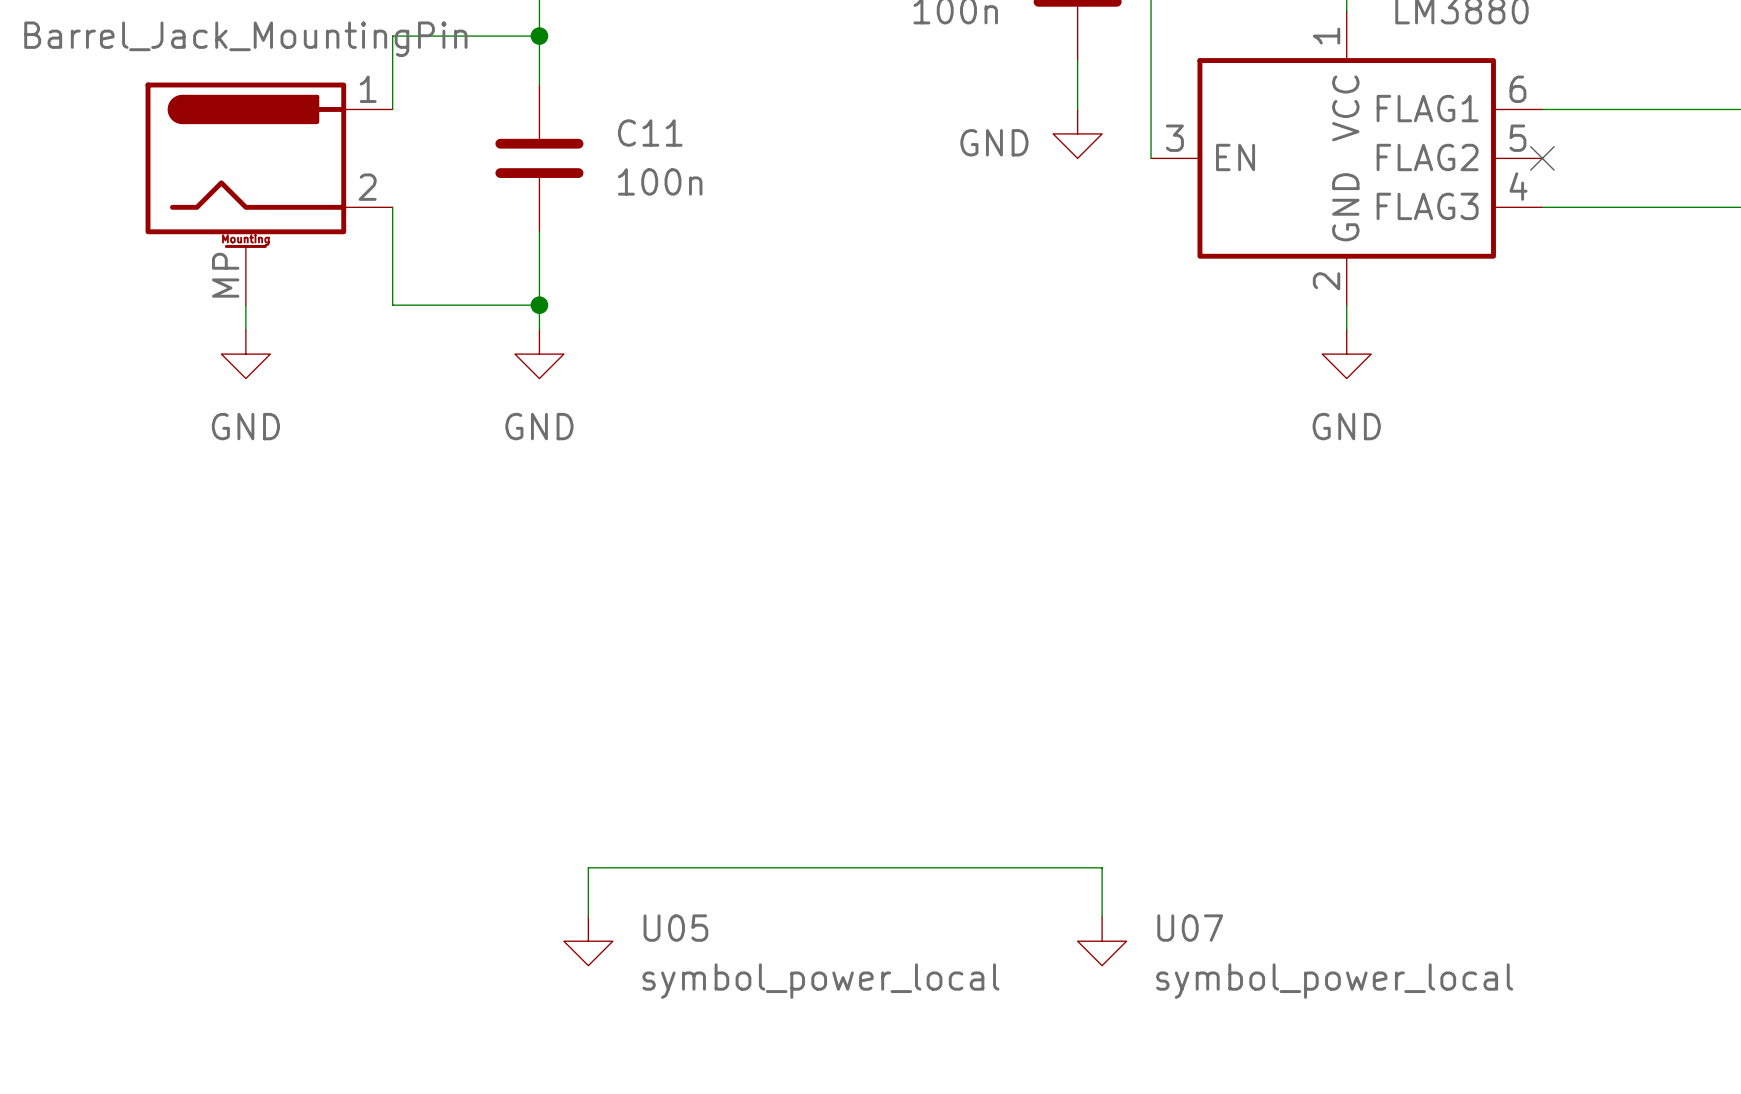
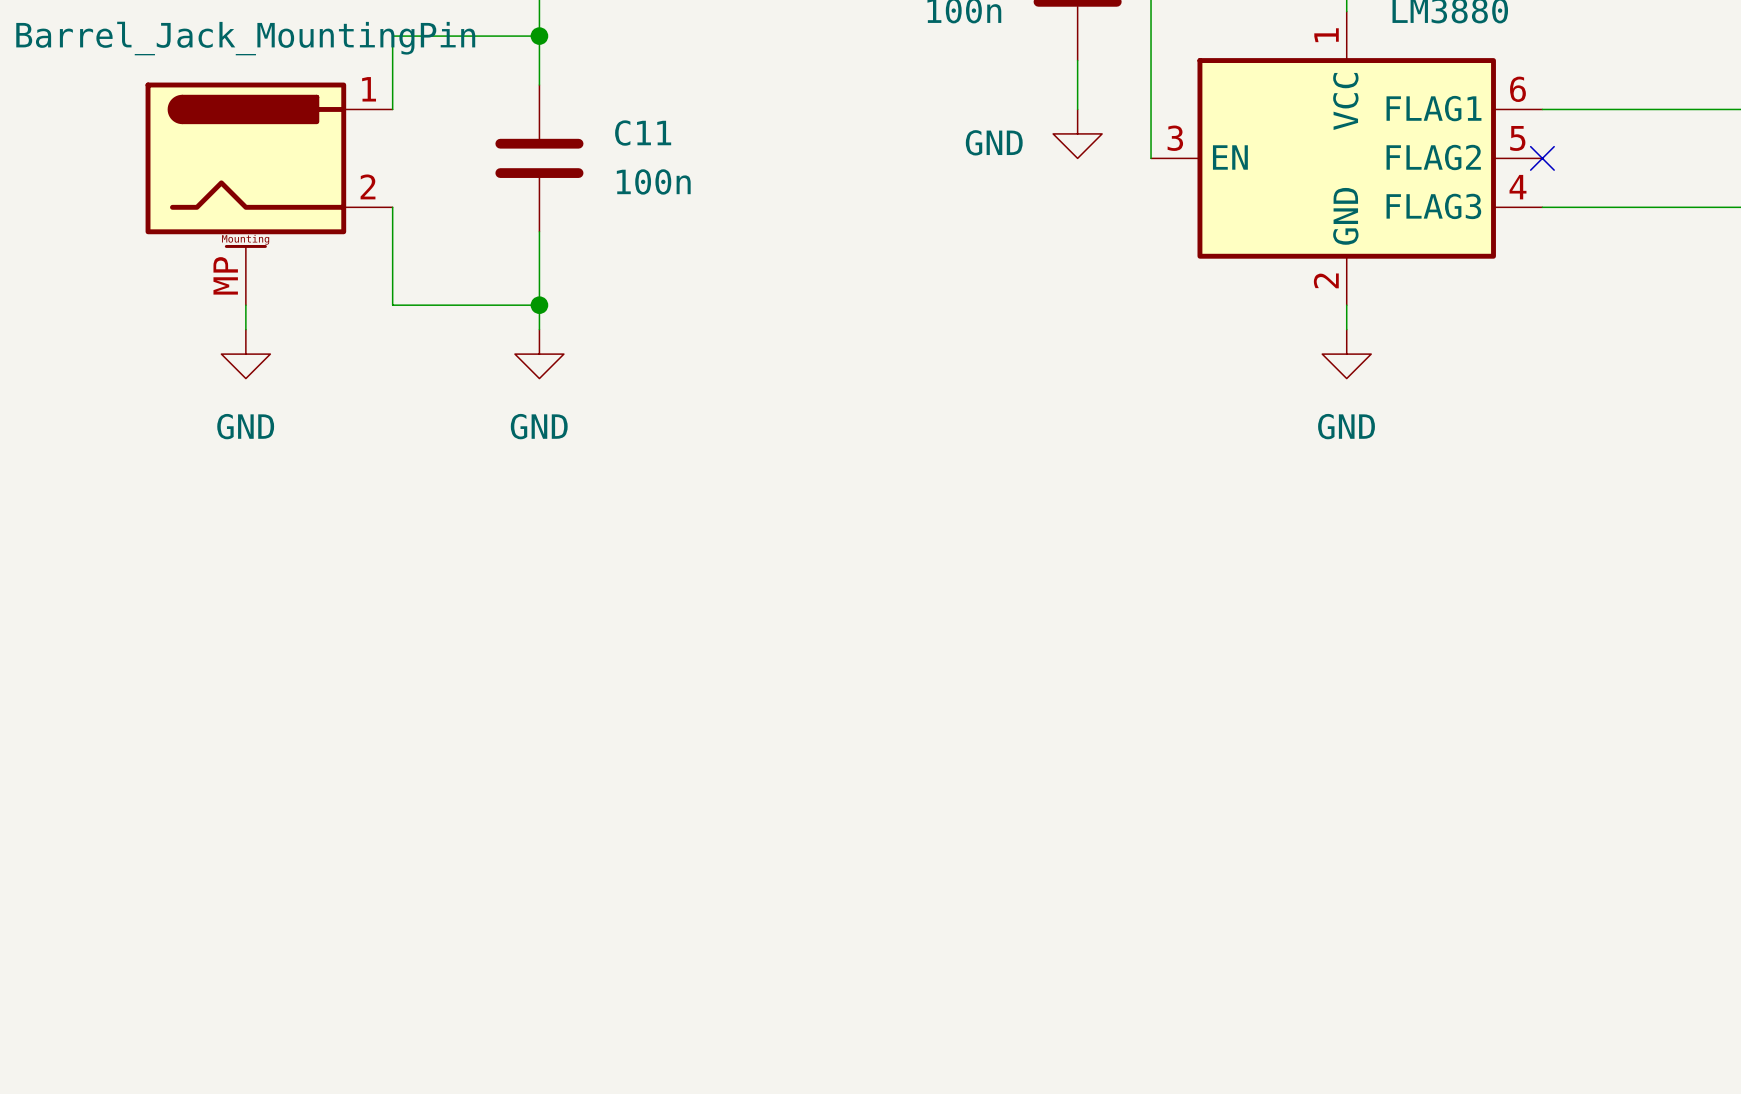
wire: (588, 916) (588, 867) (1102, 867) (1102, 916) -> none
U05: symbol_power_local (588, 941) -> none
U07: symbol_power_local (1102, 941) -> none

